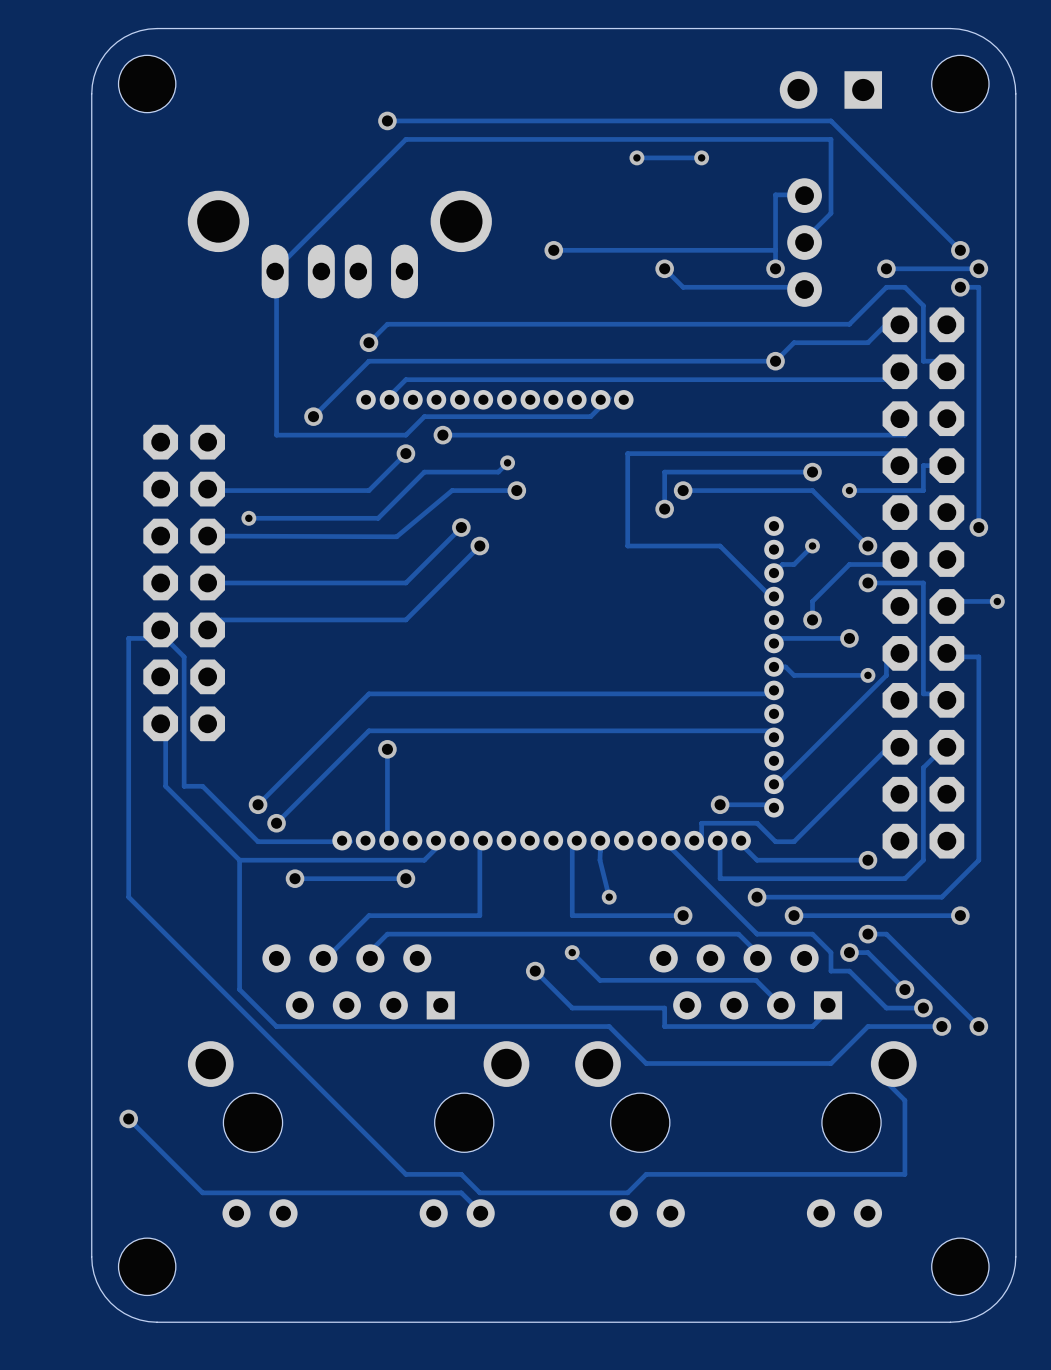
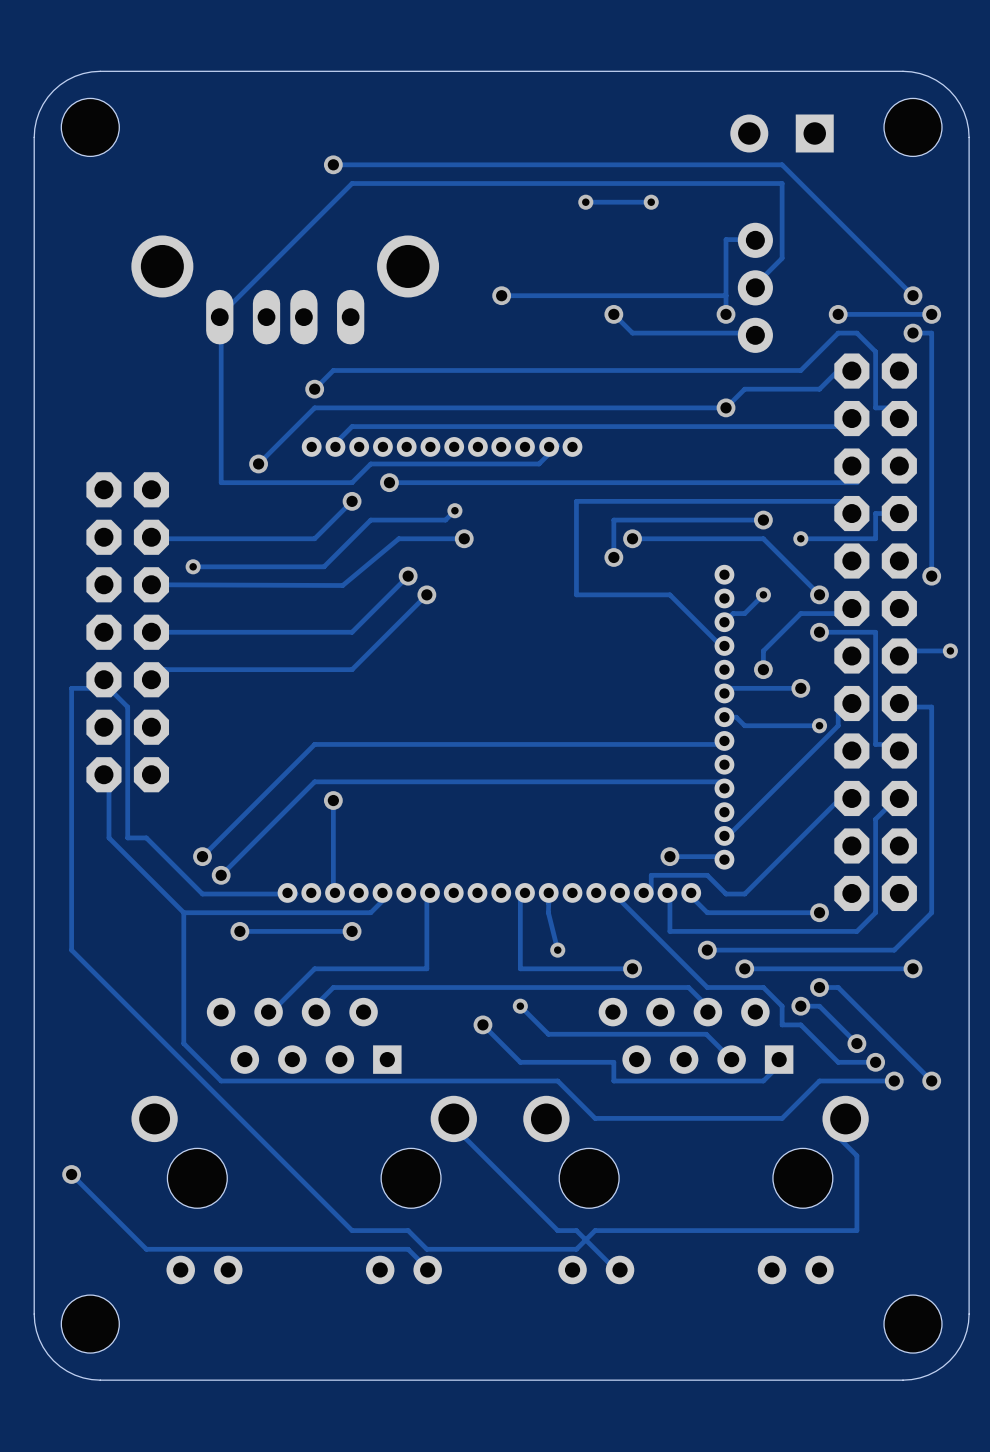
track: none -> (464, 1137) (557, 1230) (576, 1230) (613, 1267) (620, 1269)

